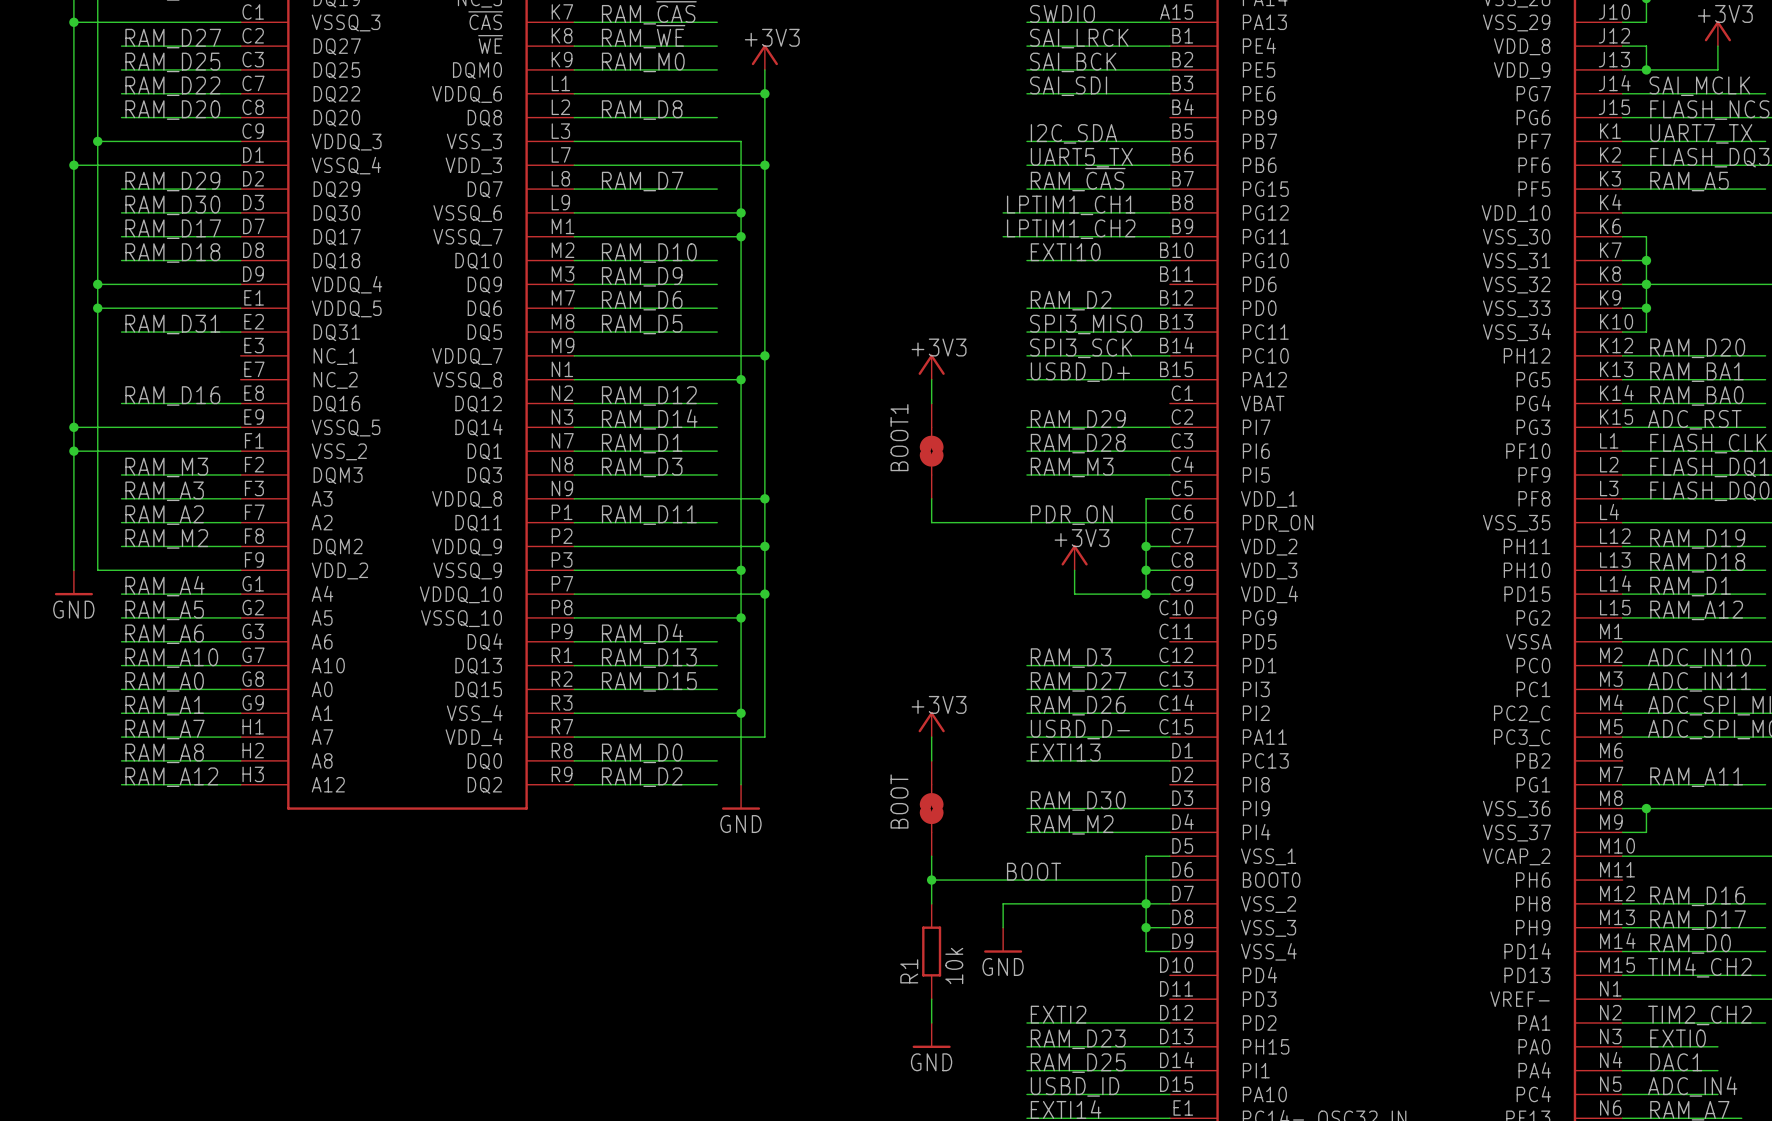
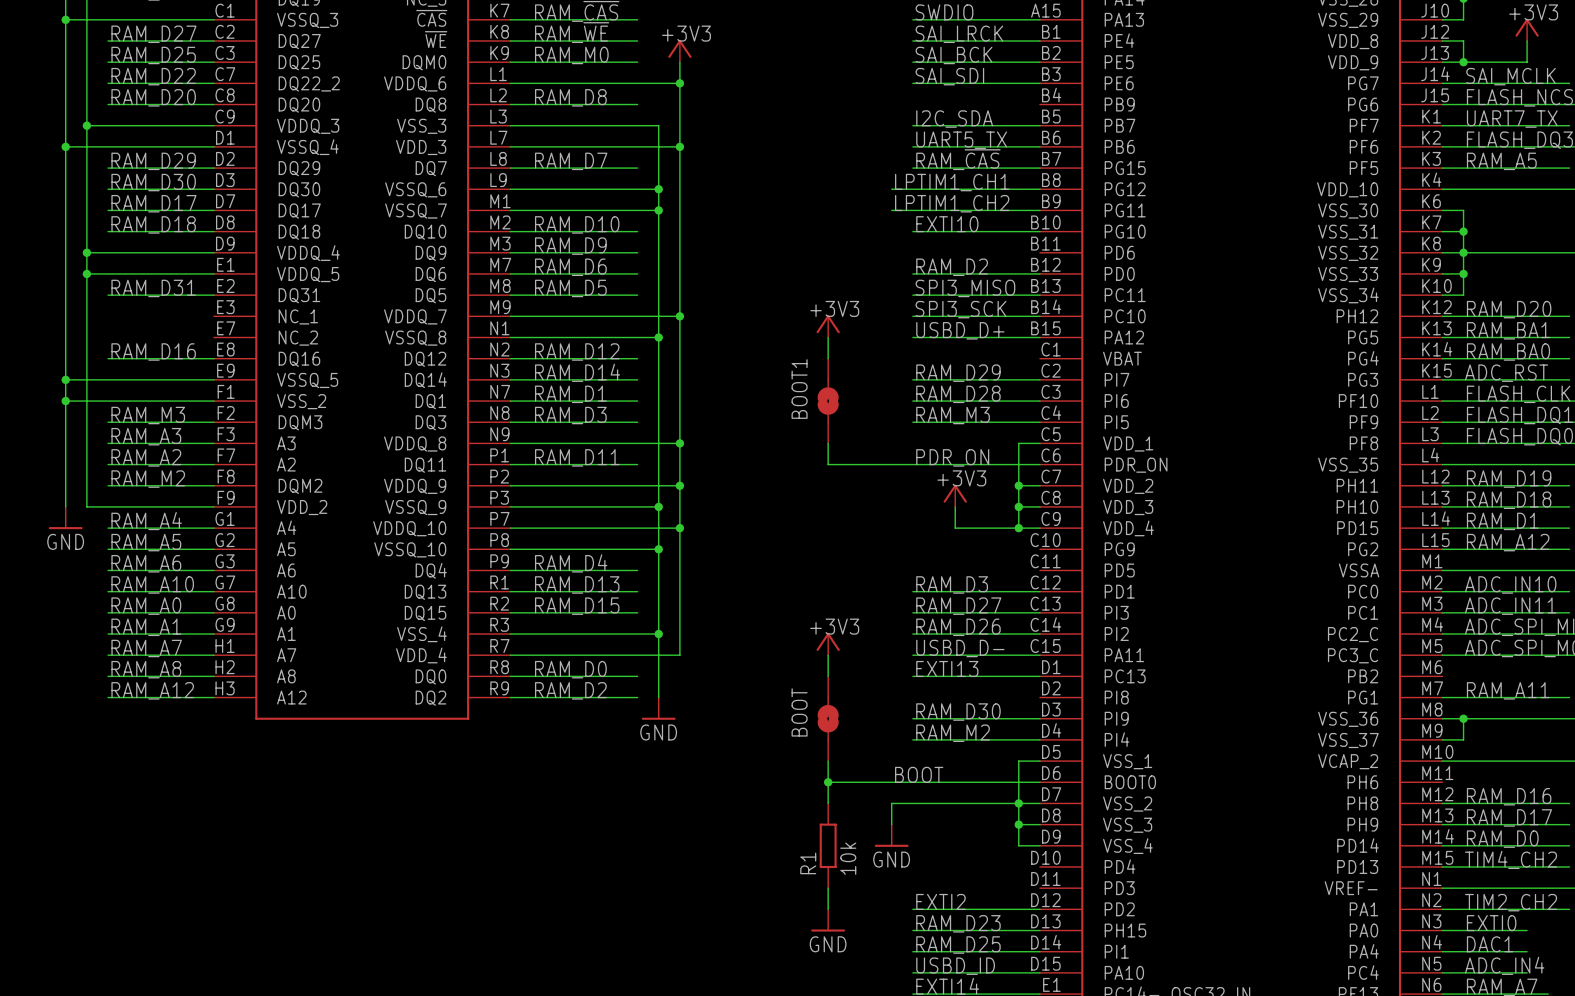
part pin name: DQ22 (336, 94) -> DQ22_2 (309, 83)

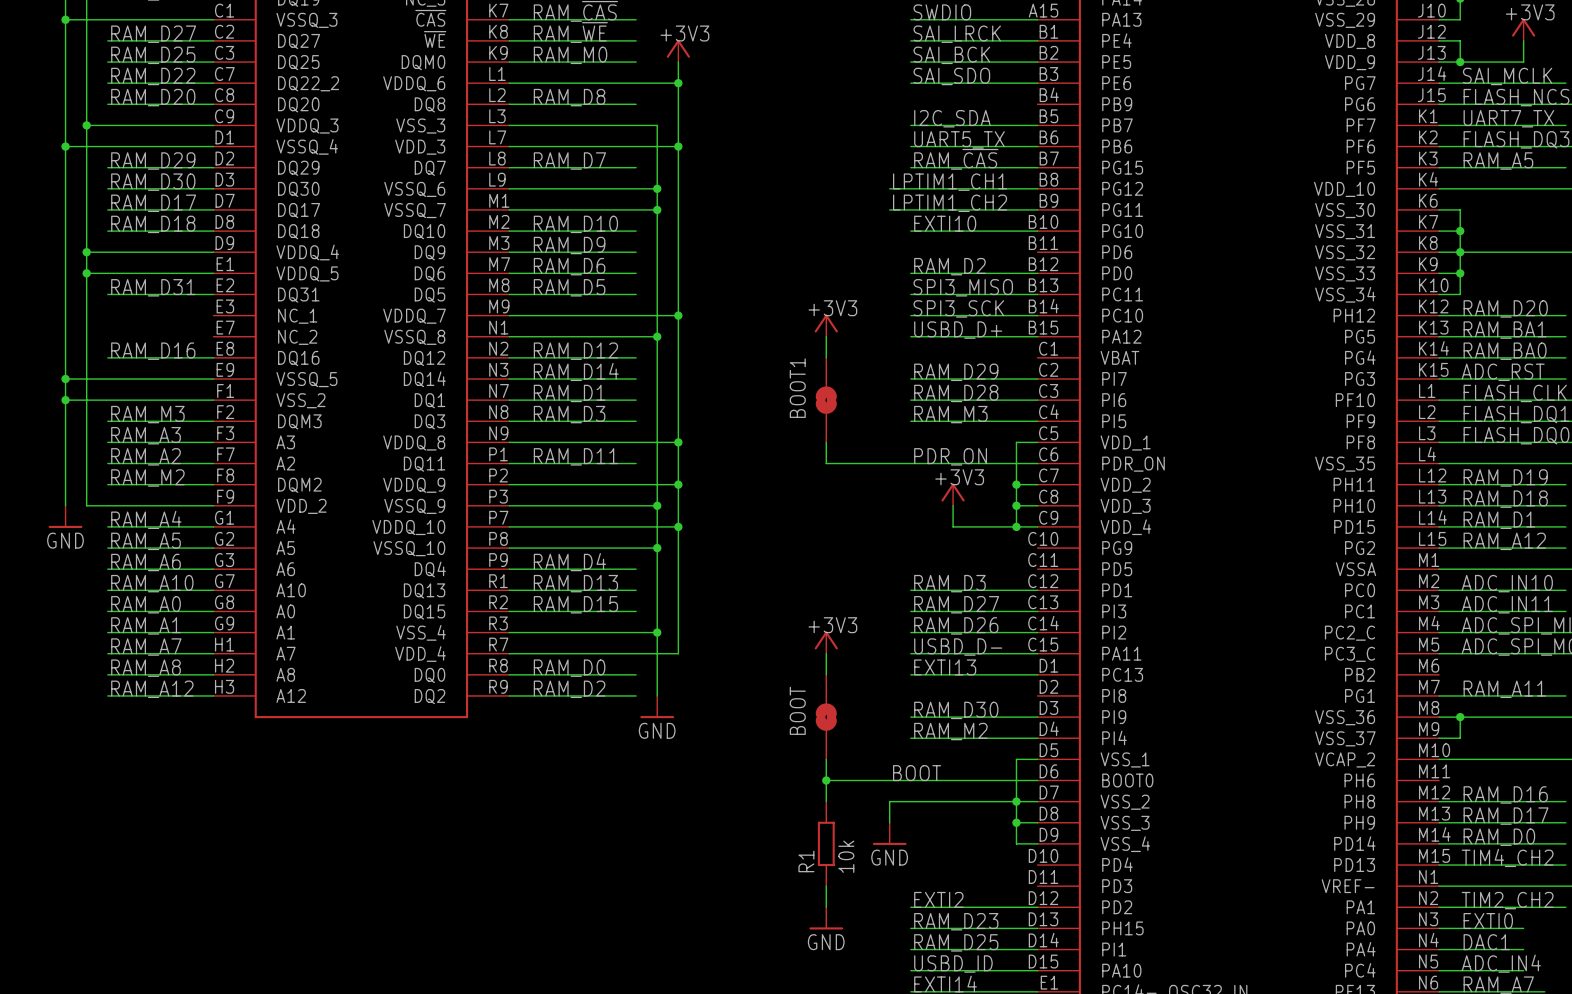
label: SAI_SDI (949, 76) -> SAI_SDO (951, 76)

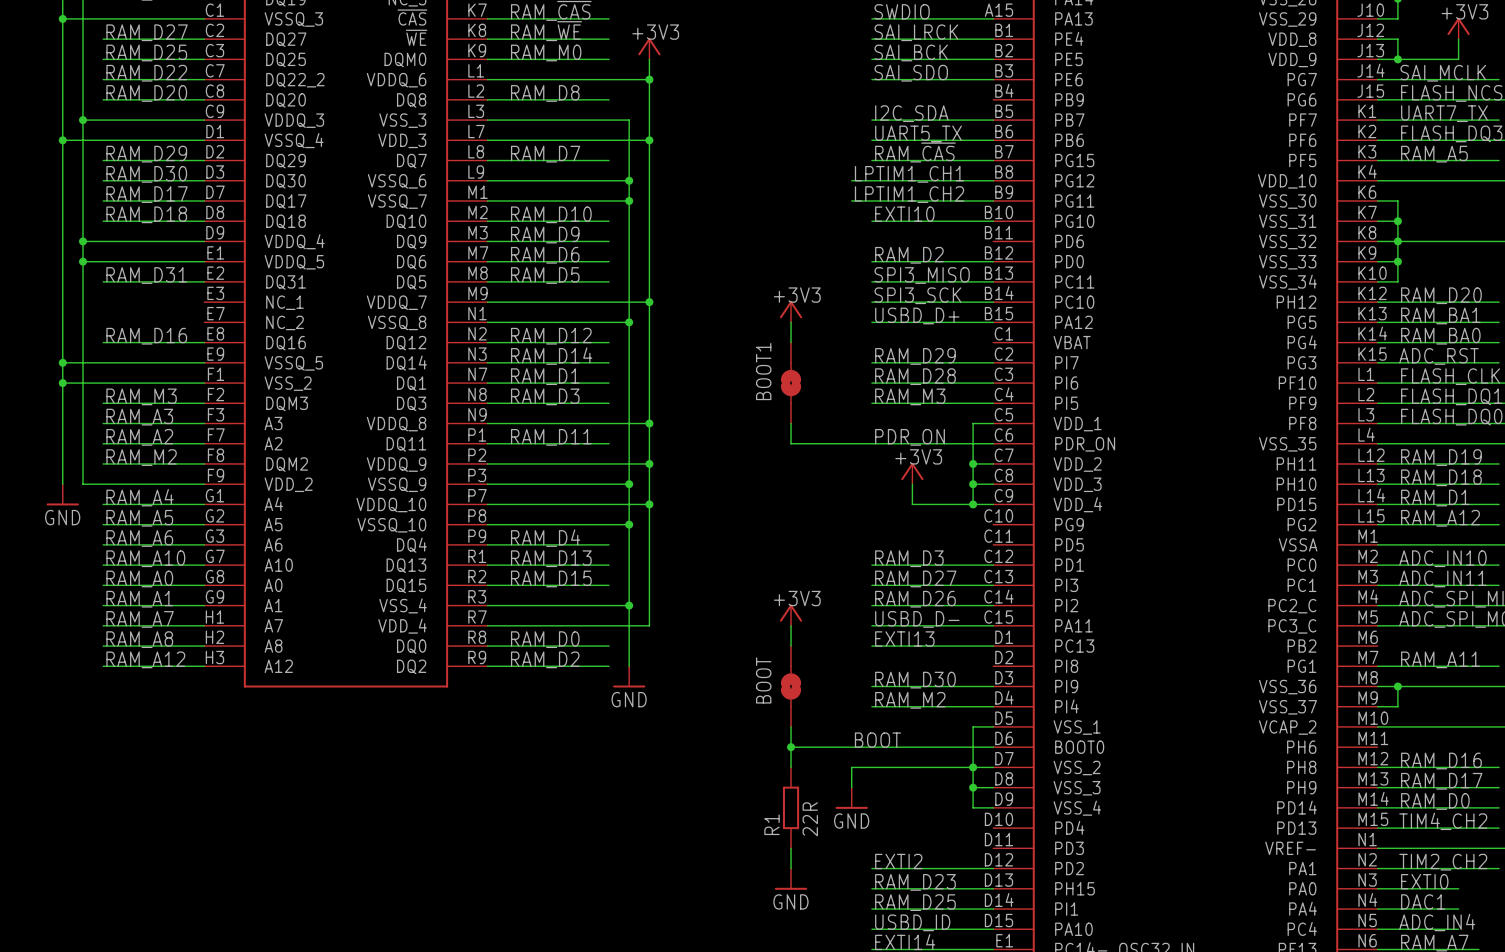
R1 value: 10k (846, 856) -> 22R (810, 819)

